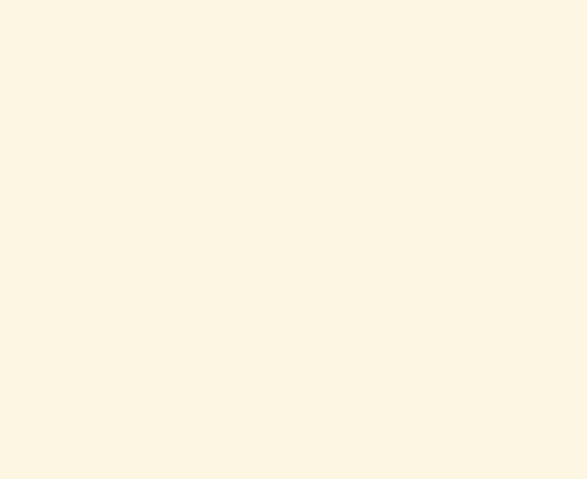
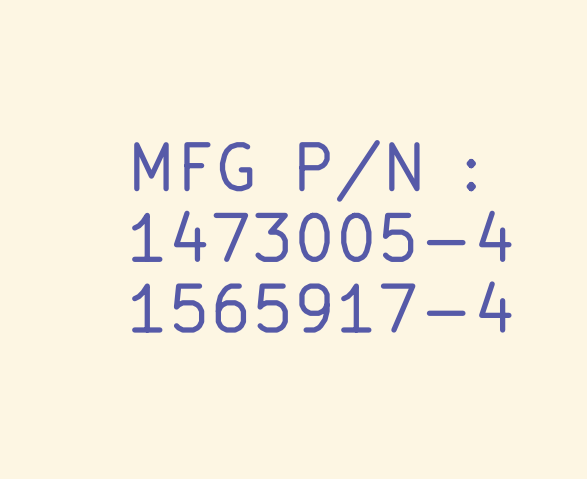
text: none -> MFG P/N : (305, 170)
text: none -> 1473005-4 (321, 236)
text: none -> 1565917-4 (321, 307)

